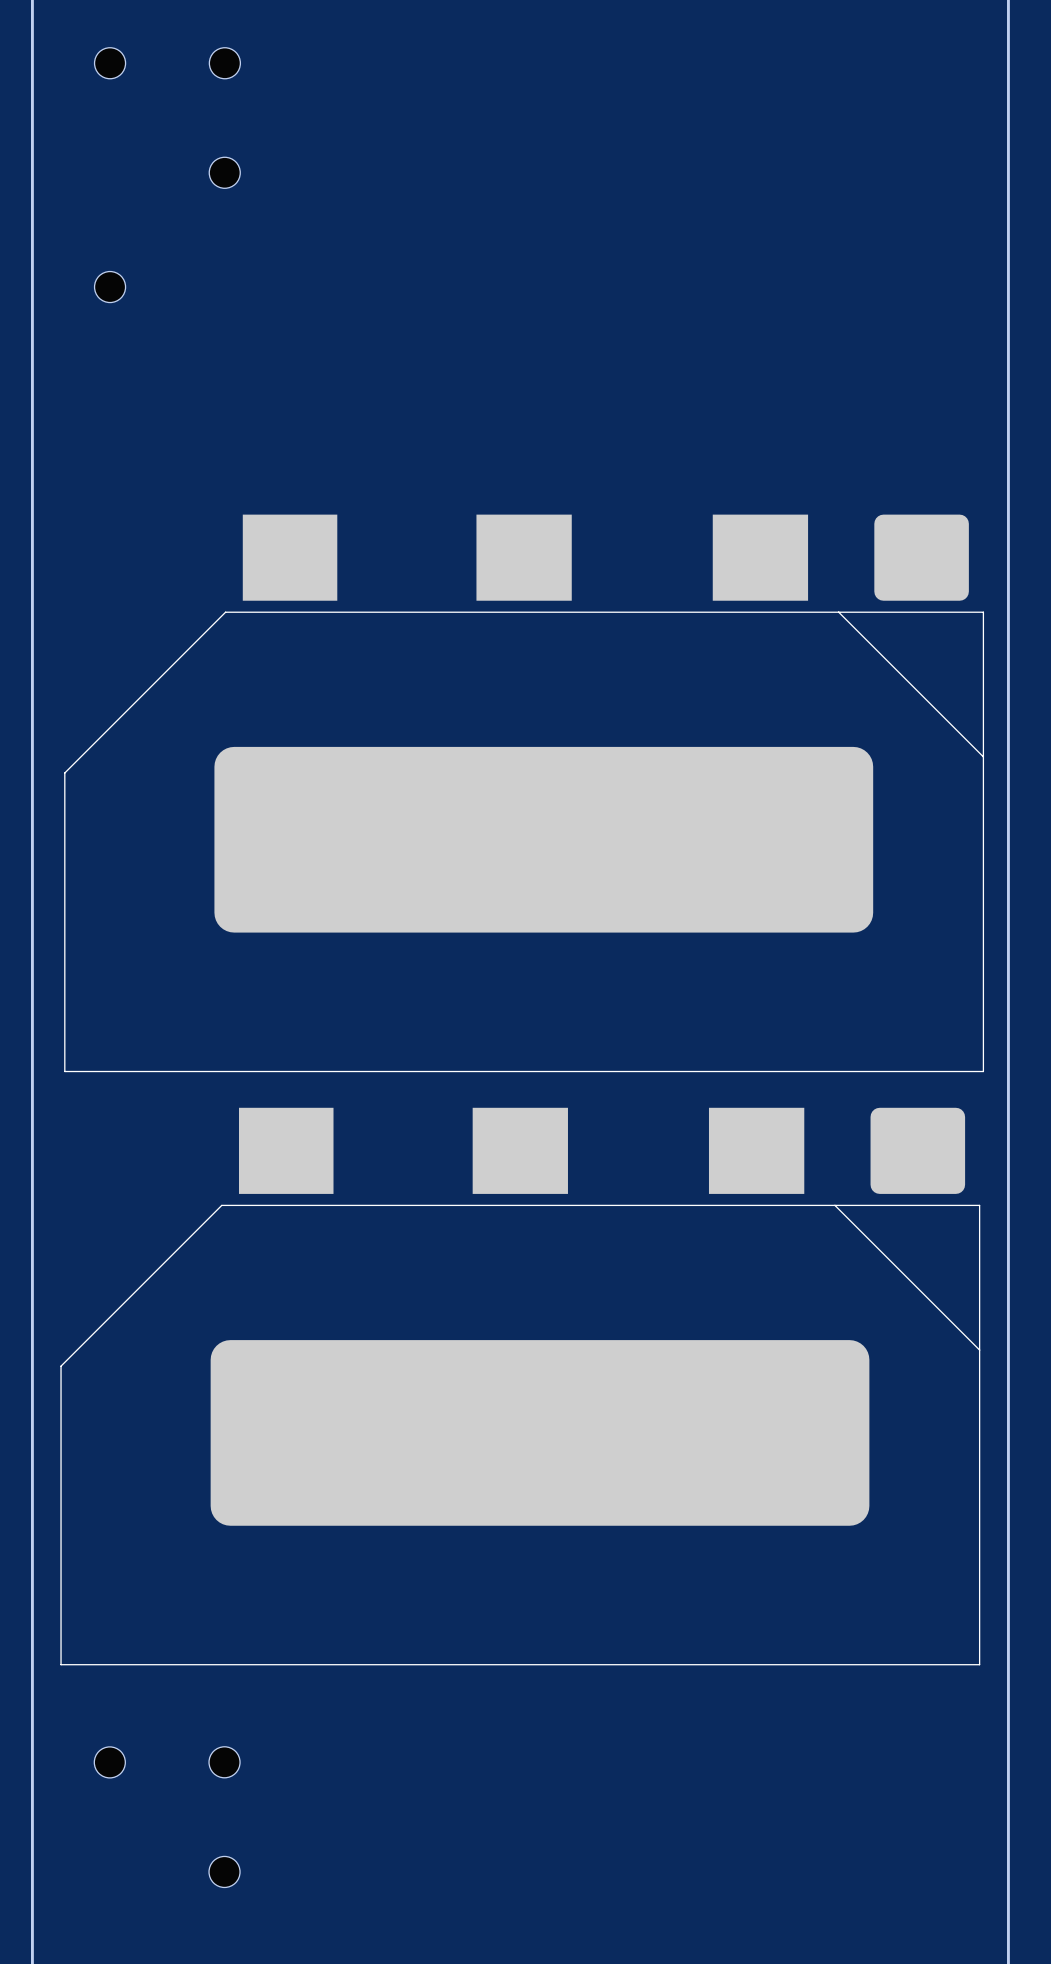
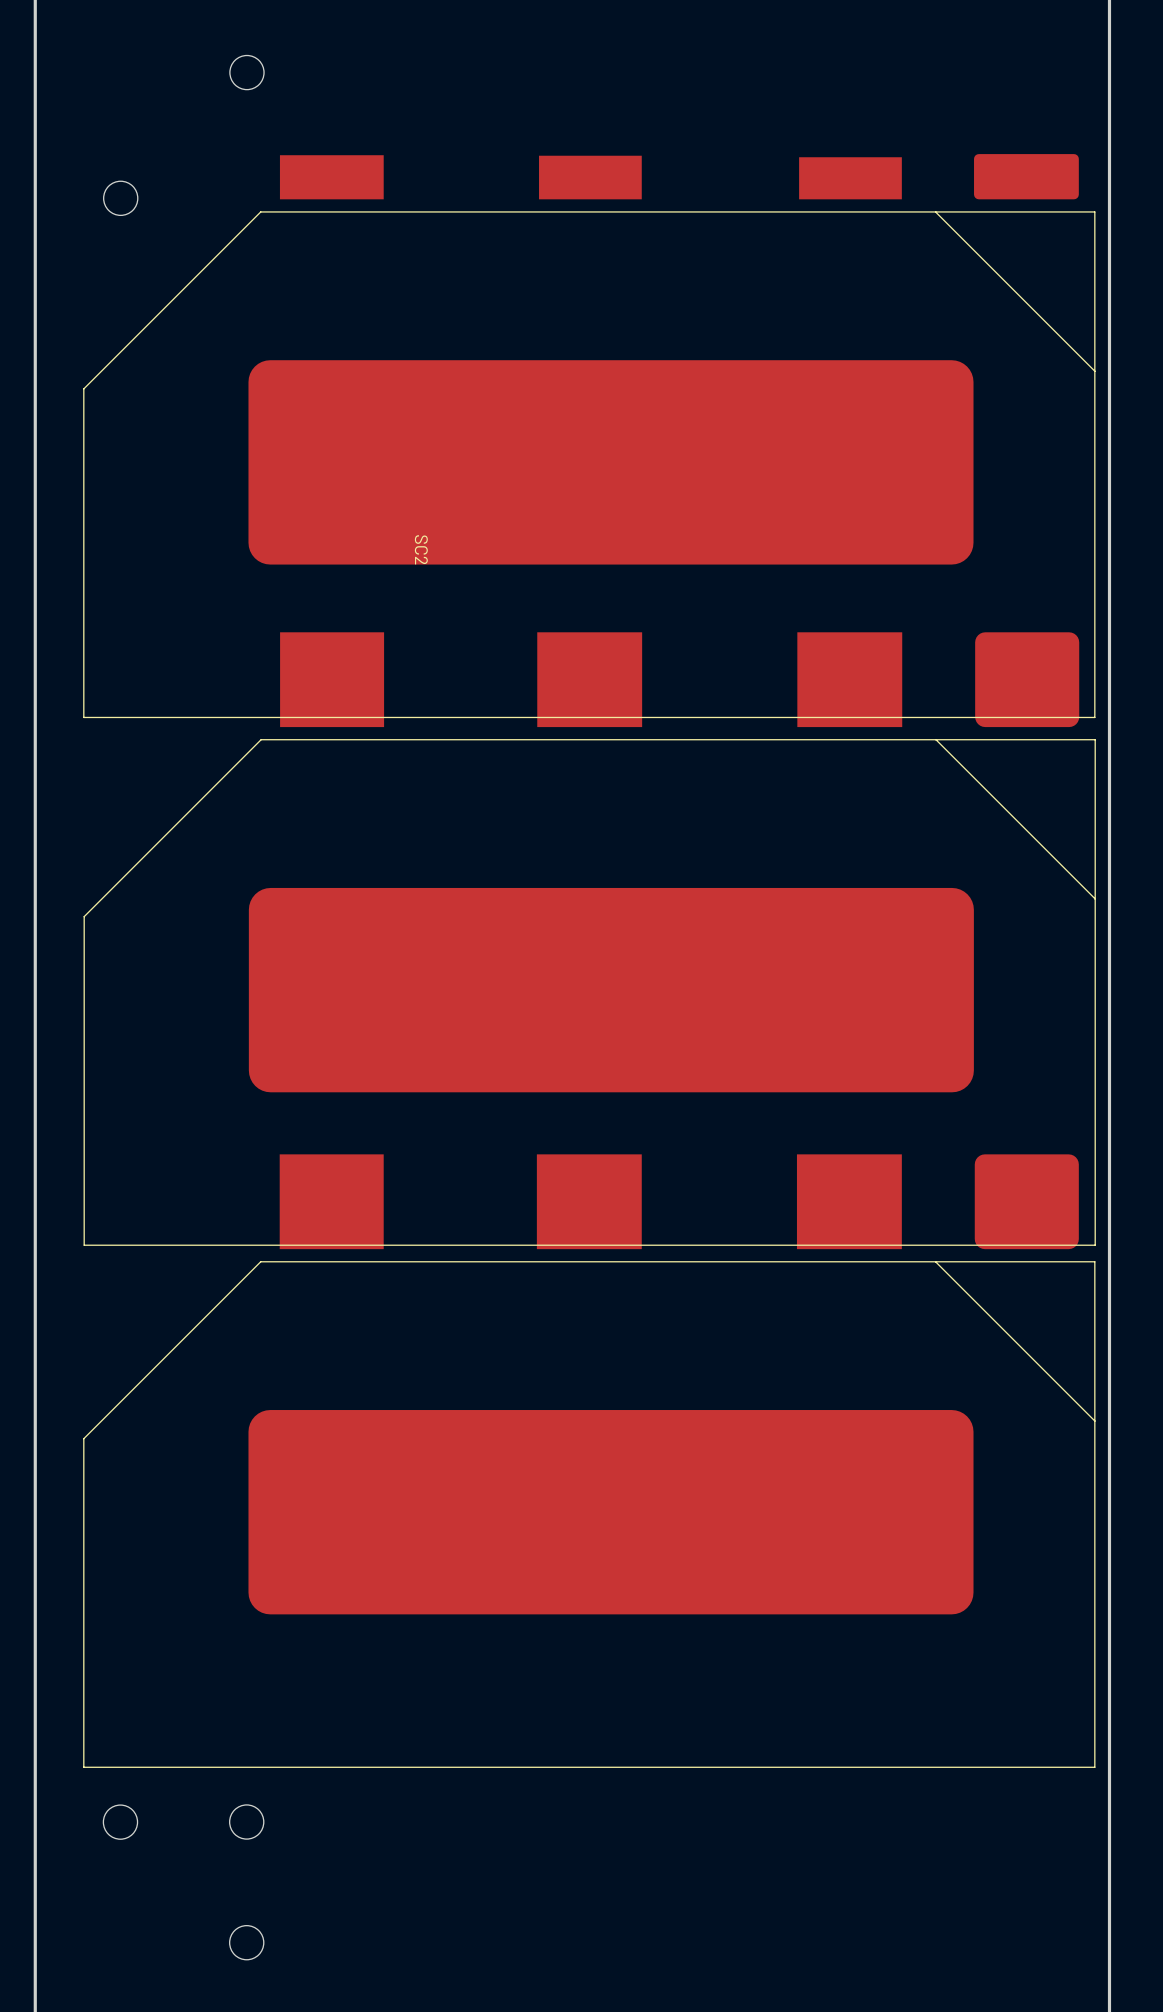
SC2: none -> (589, 436)
part position: (524, 793) -> (589, 939)
part position: (520, 1386) -> (589, 1461)

